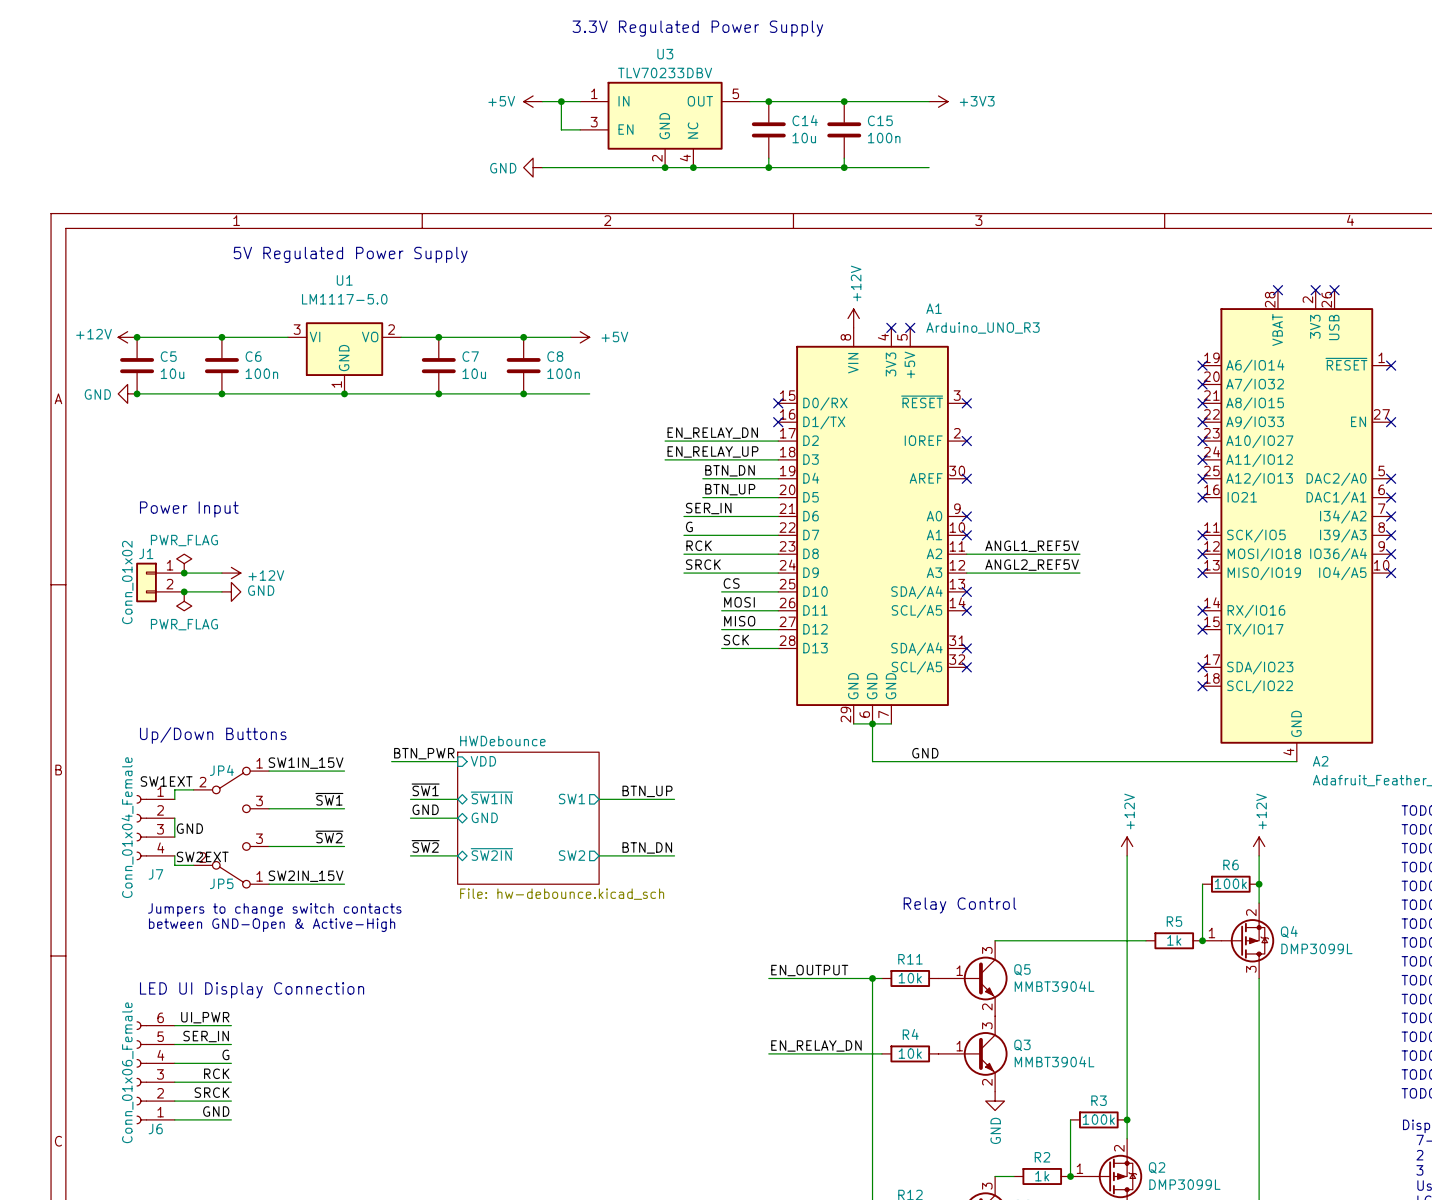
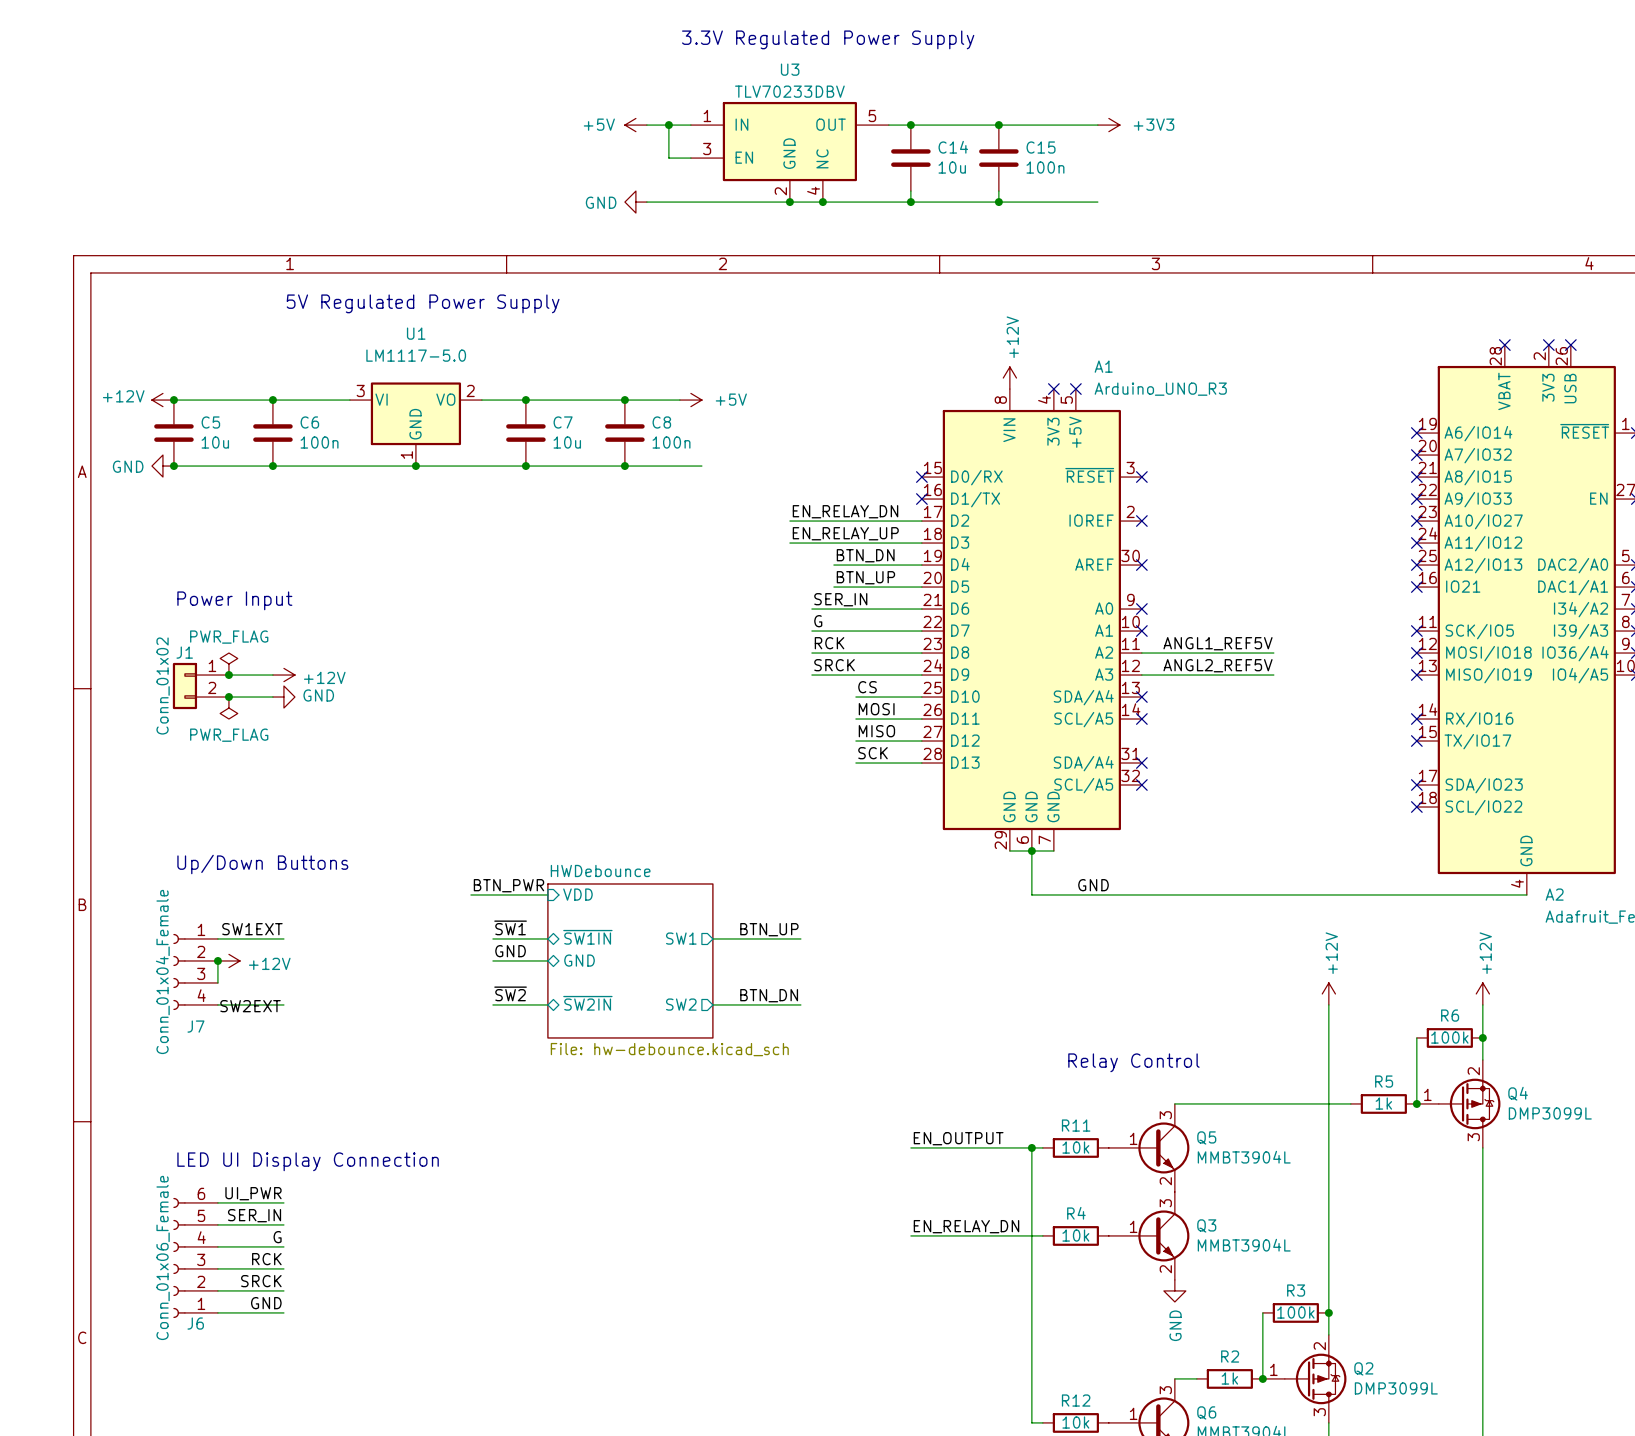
label: SW1IN_15V (306, 763) -> none
wire: (269, 771) (344, 771) -> none
label position: SW1EXT (166, 781) -> SW1EXT (252, 929)
wire: (193, 789) (174, 789) (174, 799) -> (283, 938) (217, 938)
JP4: (231, 789) -> none
label: ~{SW1} (329, 799) -> none
wire: (269, 808) (344, 808) -> none
junction: none -> (217, 960)
power symbol: none -> +12V (228, 960)
label: GND (189, 828) -> none
label: ~{SW2} (329, 836) -> none
wire: (269, 846) (344, 846) -> none
wire: (174, 855) (174, 865) (193, 865) -> (217, 1004) (283, 1004)
JP5: (231, 865) -> none
label: SW2IN_15V (306, 876) -> none
wire: (269, 884) (344, 884) -> none
text: Jumpers to change switch contacts (274, 910) -> none
text: between GND-Open & Active-High (272, 925) -> none

